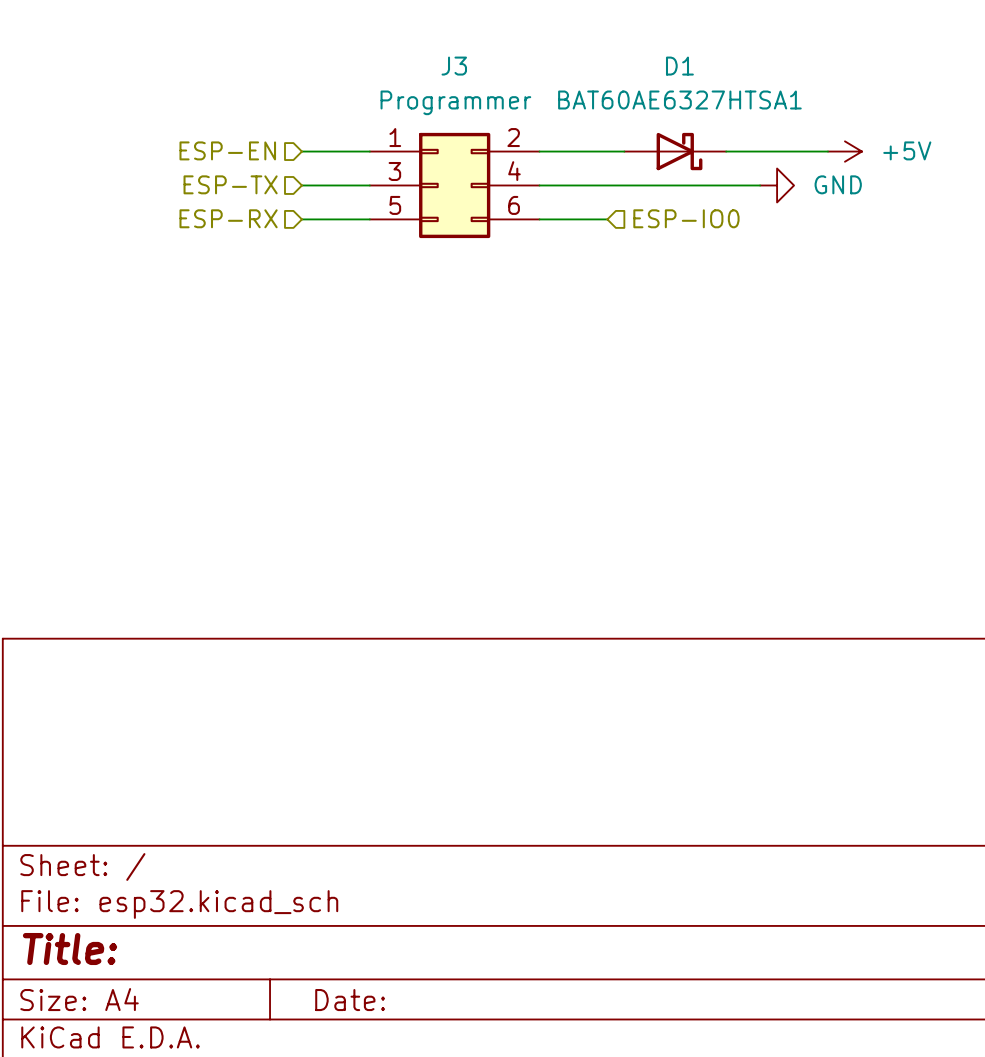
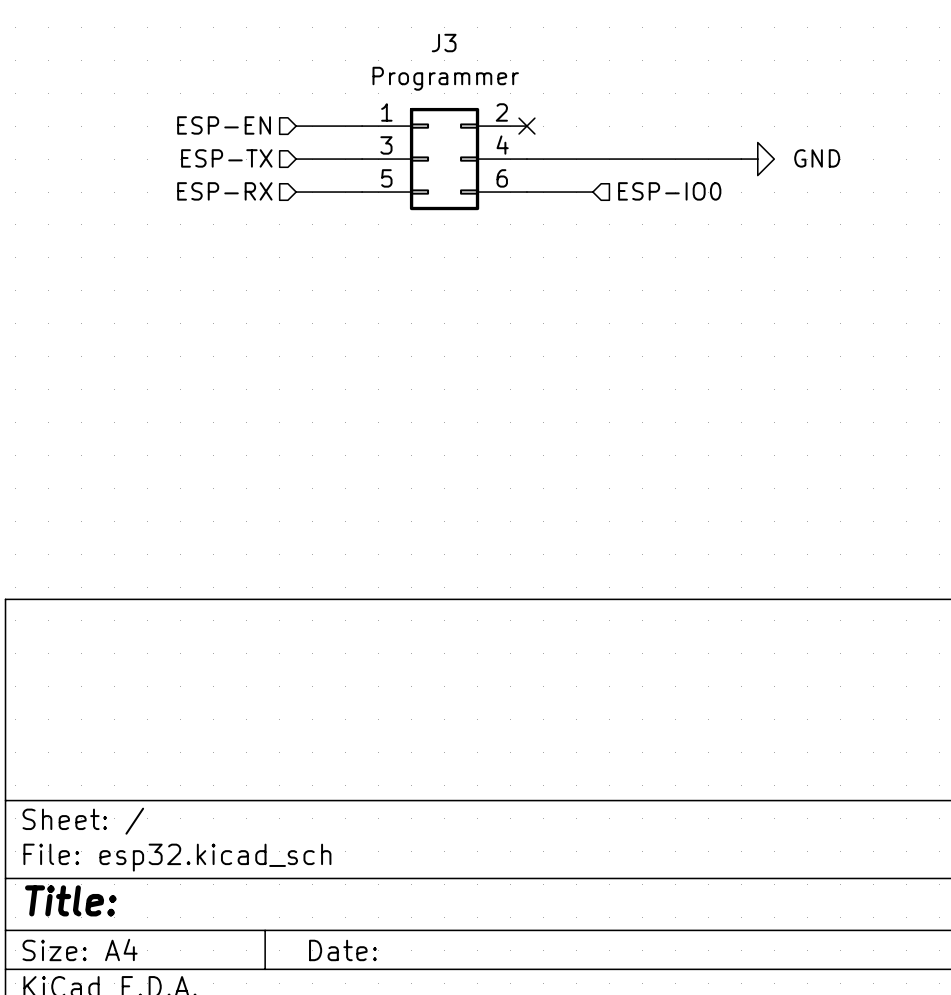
wire: (539, 151) (624, 151) -> none
no-connect mark: none -> (526, 126)
D1: BAT60AE6327HTSA1 (675, 151) -> none
wire: (726, 151) (827, 151) -> none
power symbol: +5V (844, 151) -> none

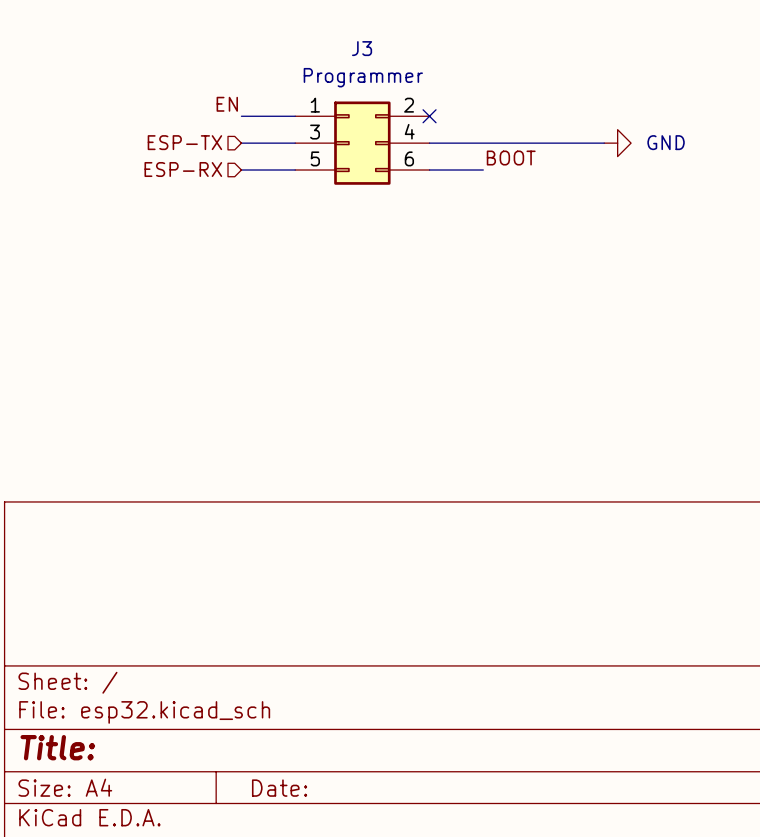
label: none -> EN (227, 104)
hierarchical label: ESP-EN (224, 125) -> none
label: none -> BOOT (511, 158)
hierarchical label: ESP-IO0 (669, 191) -> none

